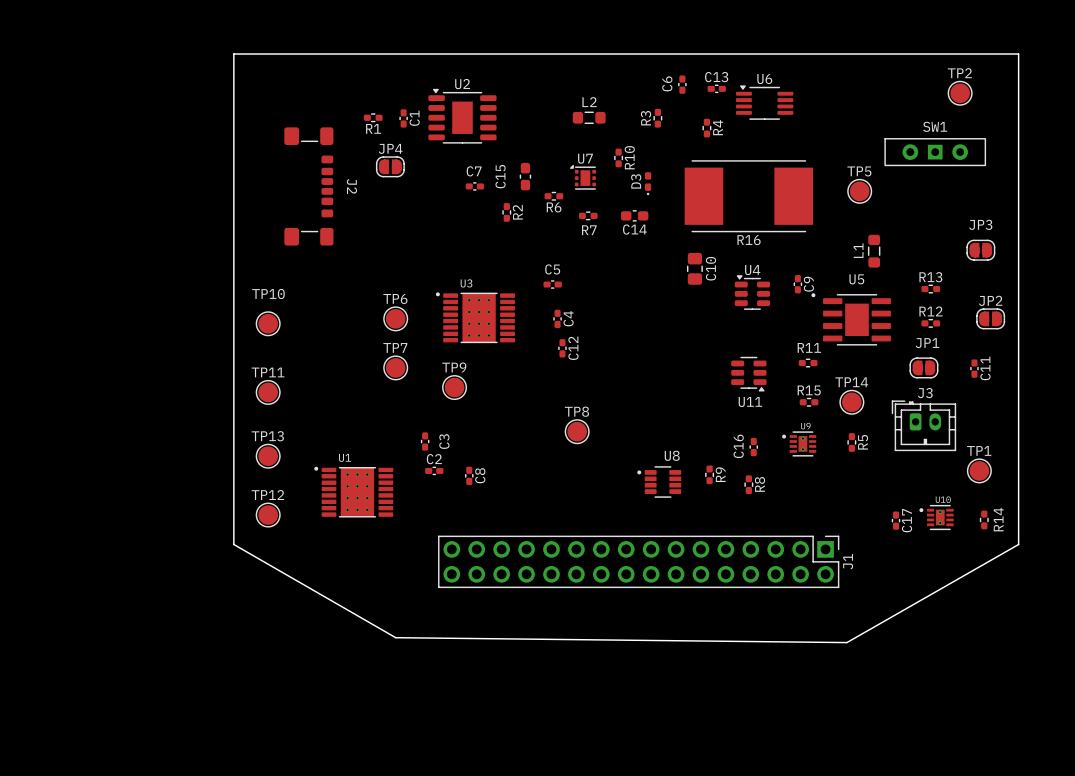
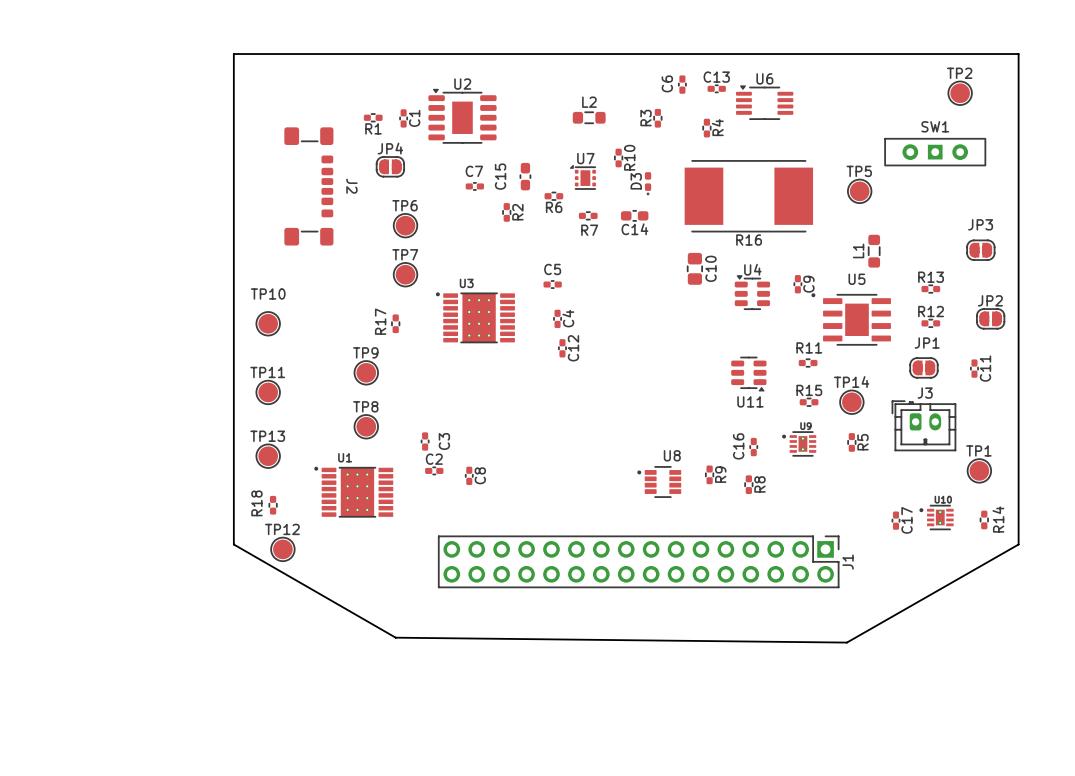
TP6 position: (395, 318) -> (405, 225)
R17: none -> (395, 323)
TP7 position: (395, 367) -> (405, 274)
TP9 position: (454, 387) -> (366, 372)
TP8 position: (577, 431) -> (366, 426)
R18: none -> (273, 505)
TP12 position: (268, 515) -> (282, 549)

